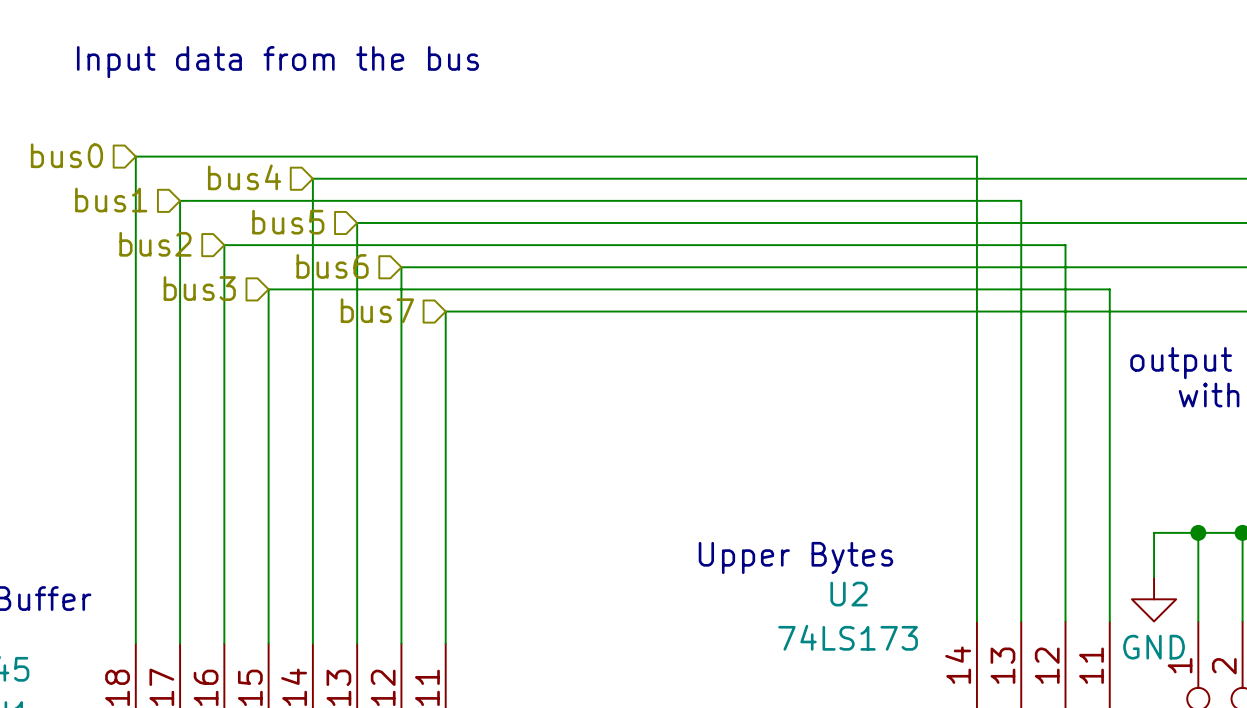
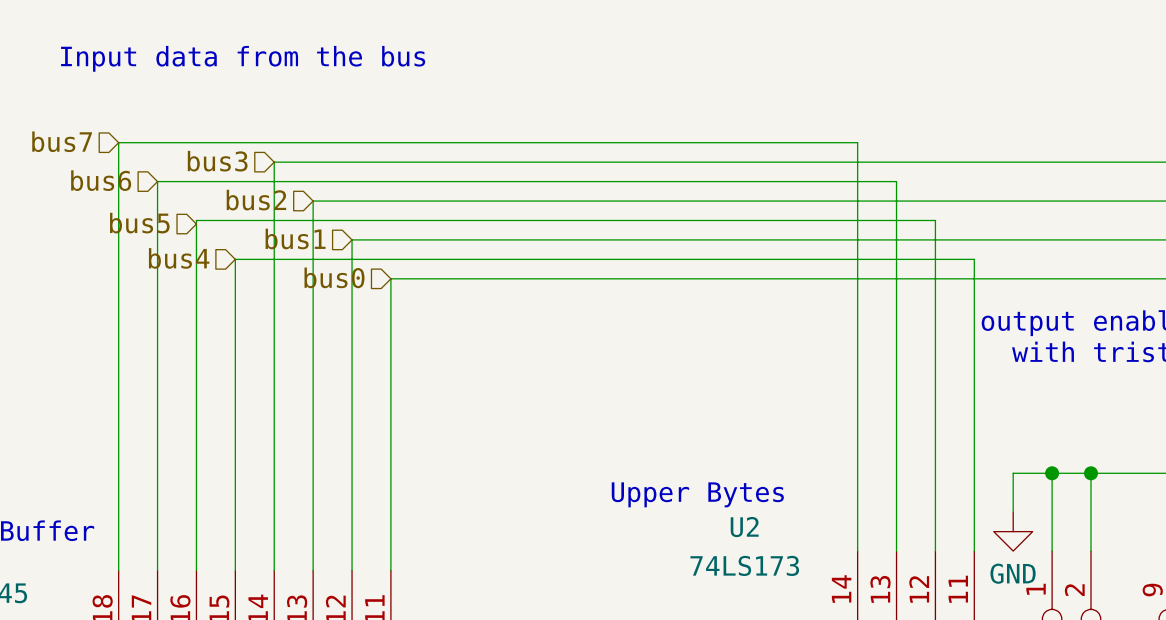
hierarchical label: bus0 (66, 155) -> bus7 (62, 141)
hierarchical label: bus4 (244, 177) -> bus3 (217, 161)
hierarchical label: bus1 (111, 200) -> bus6 (101, 180)
hierarchical label: bus5 (288, 222) -> bus2 (256, 200)
hierarchical label: bus2 (155, 244) -> bus5 (139, 223)
hierarchical label: bus6 (332, 266) -> bus1 (295, 238)
hierarchical label: bus3 (199, 288) -> bus4 (179, 258)
hierarchical label: bus7 (377, 310) -> bus0 (334, 277)

